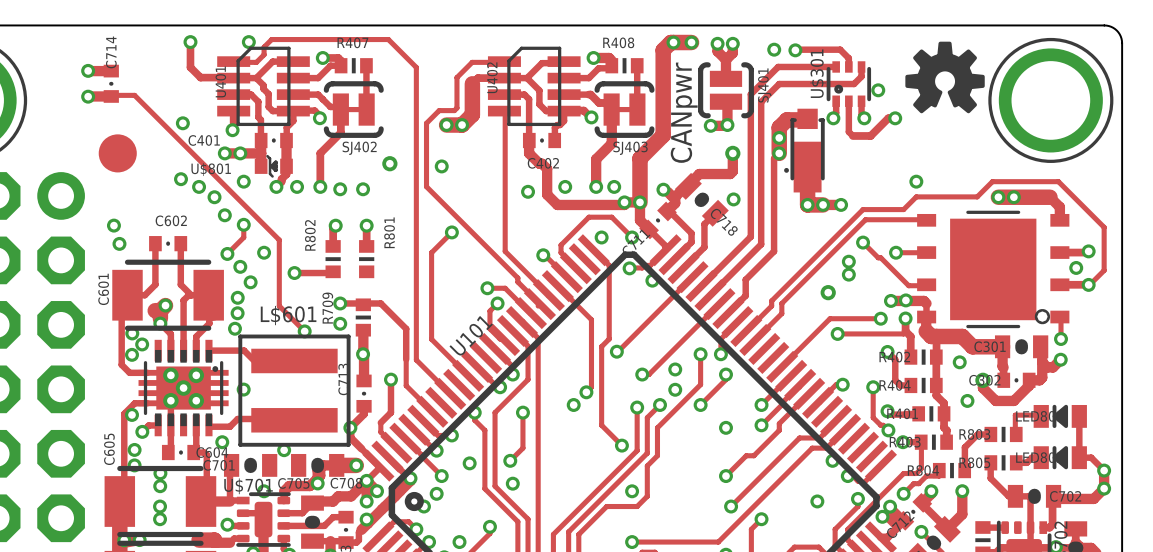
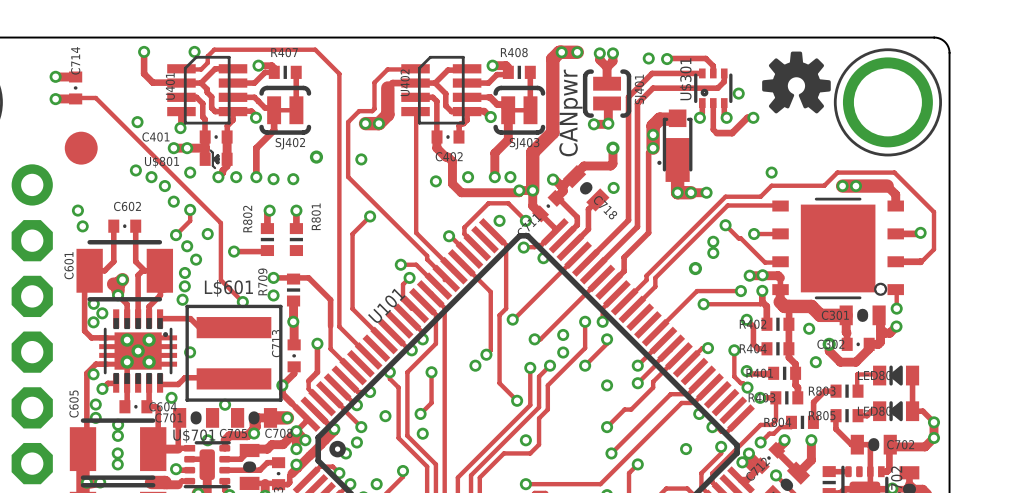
via: (1076, 267) -> none
via: (1088, 284) -> none

